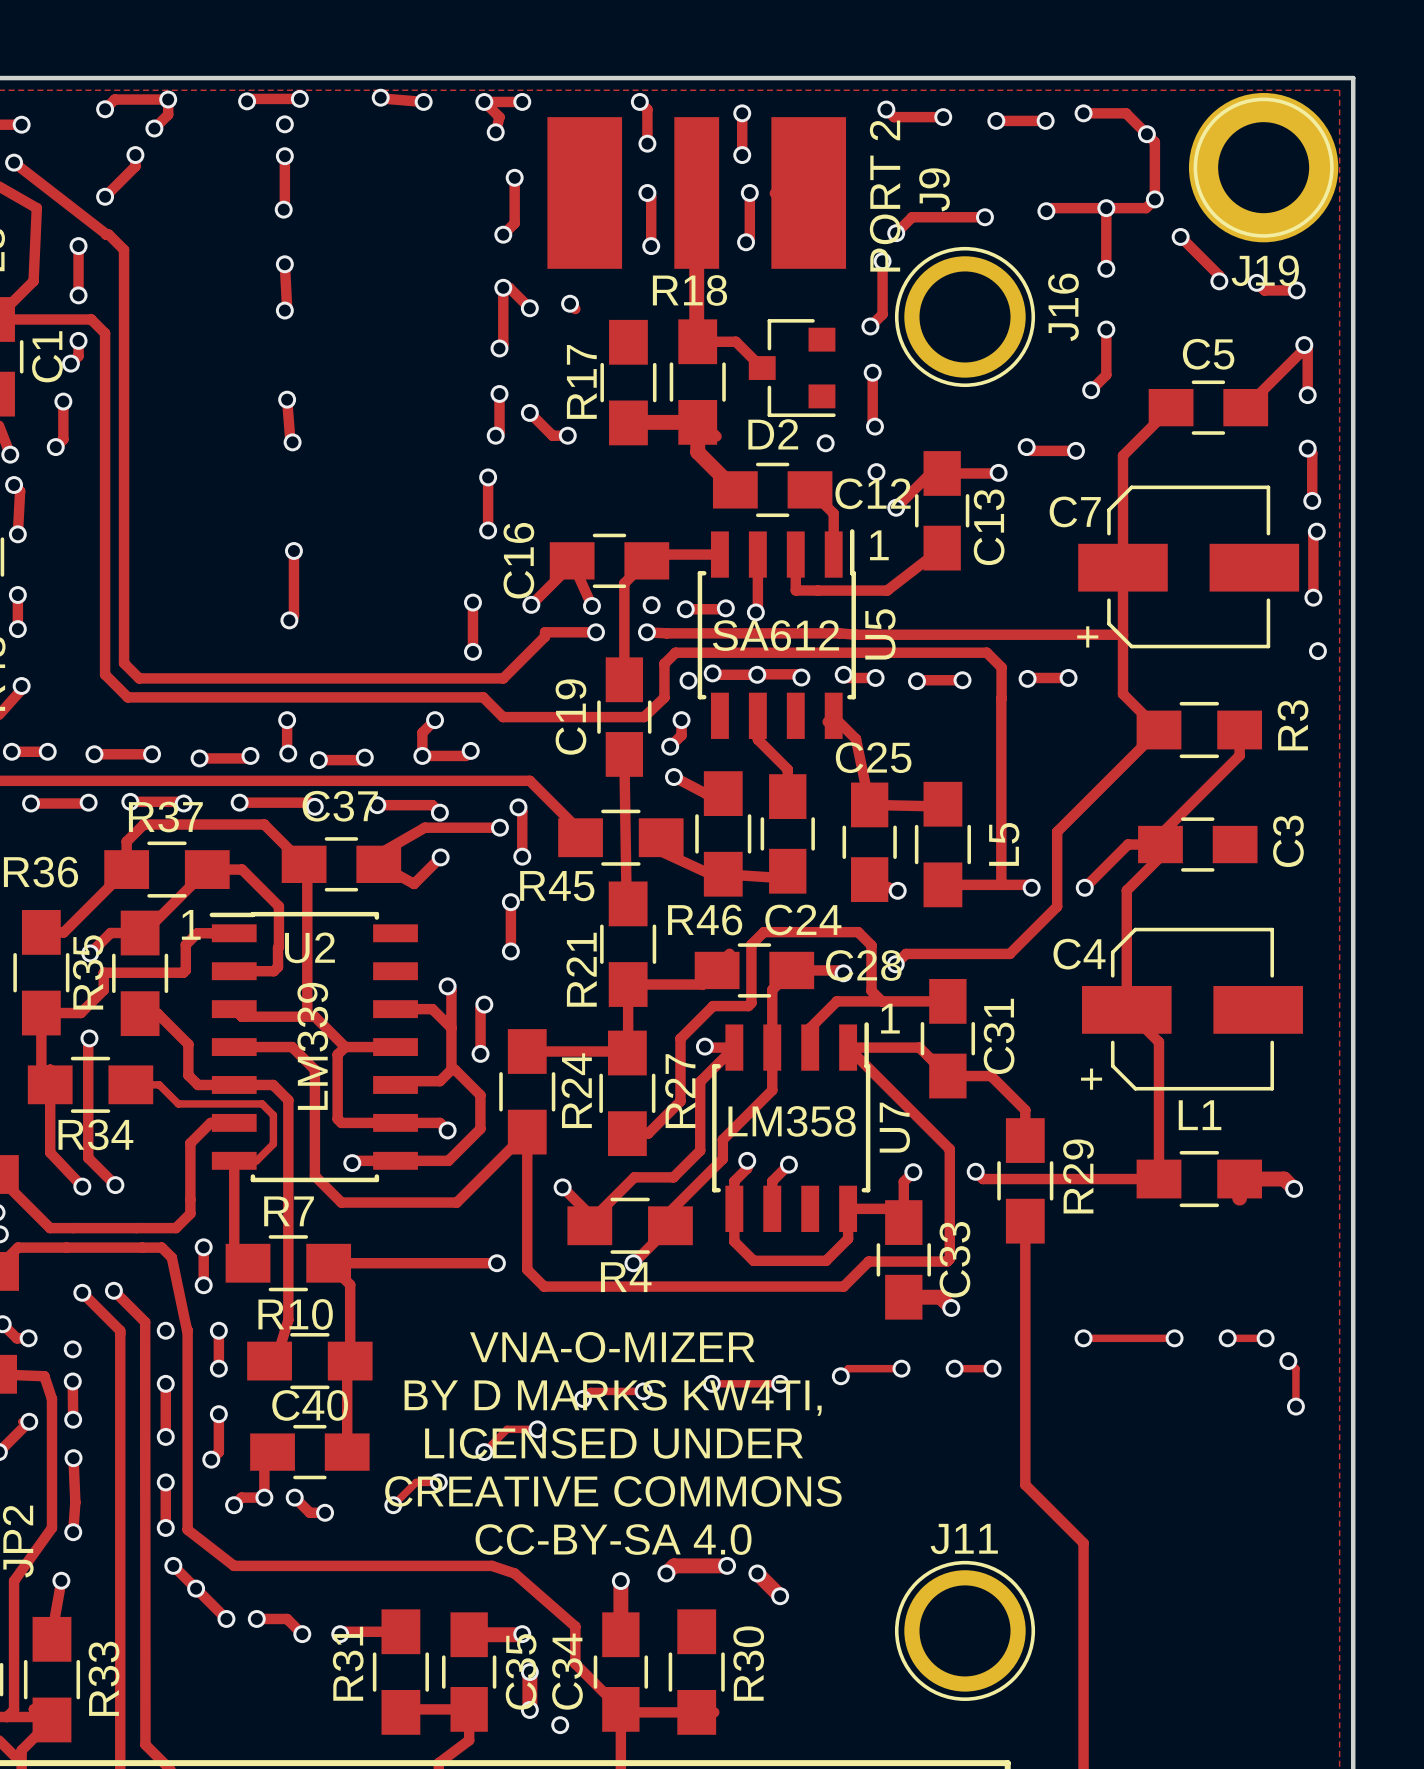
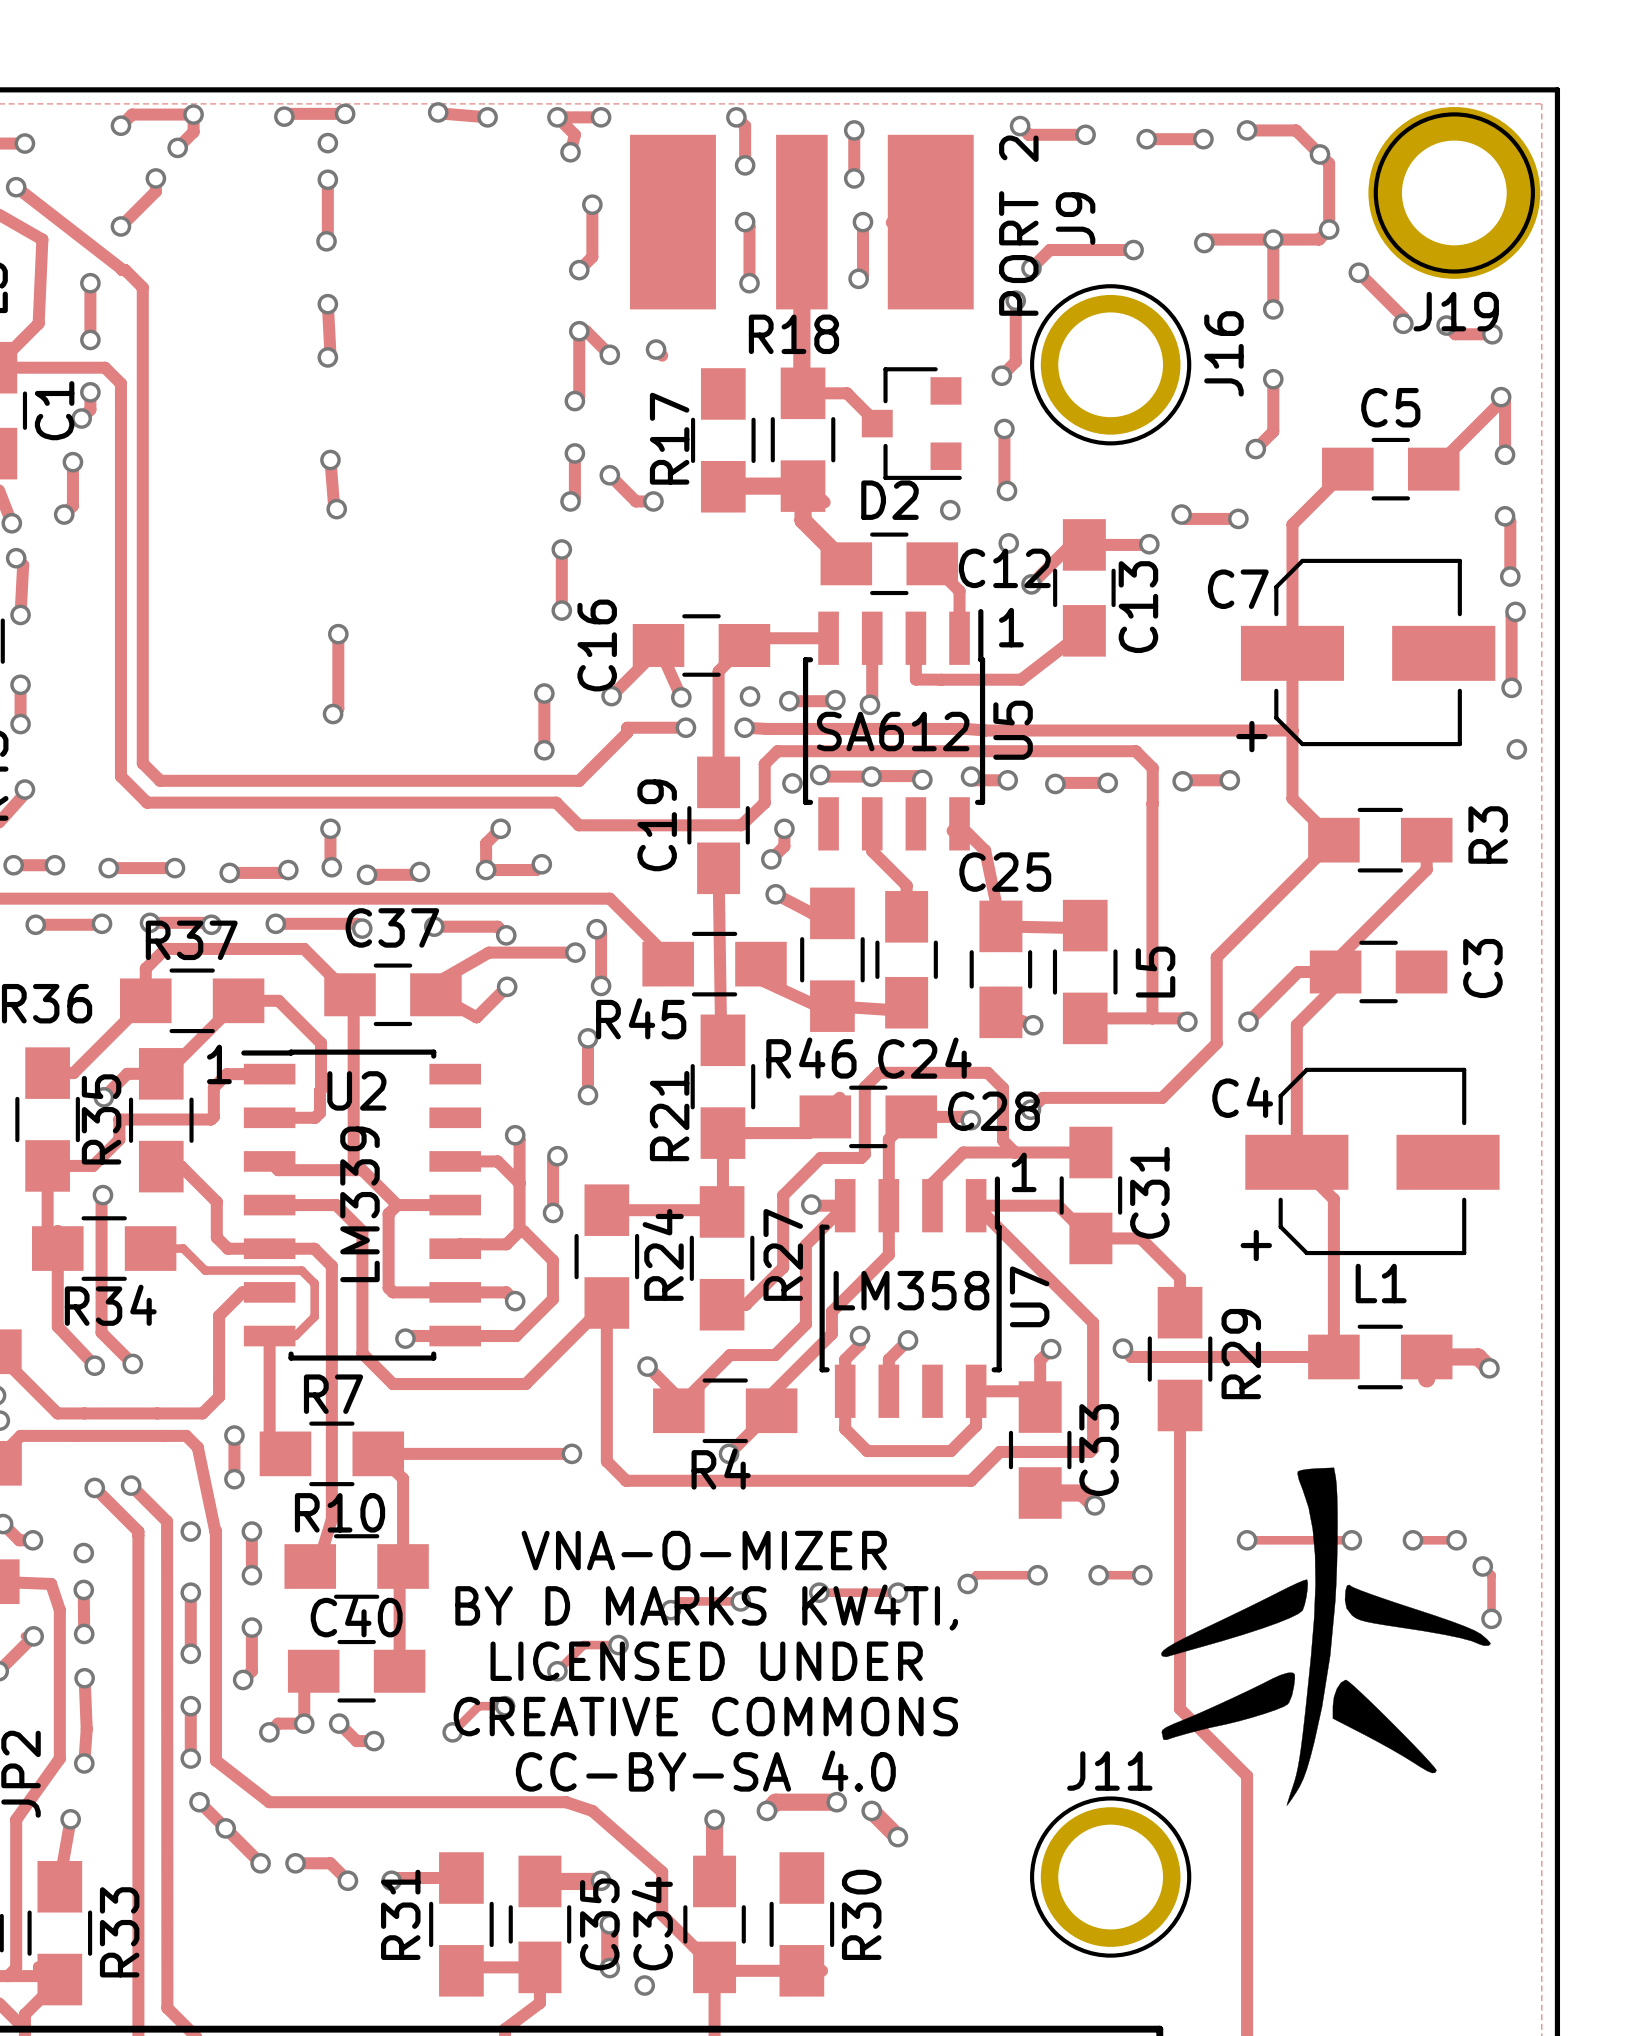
drawing: none -> [1161, 1467, 1491, 1806]

